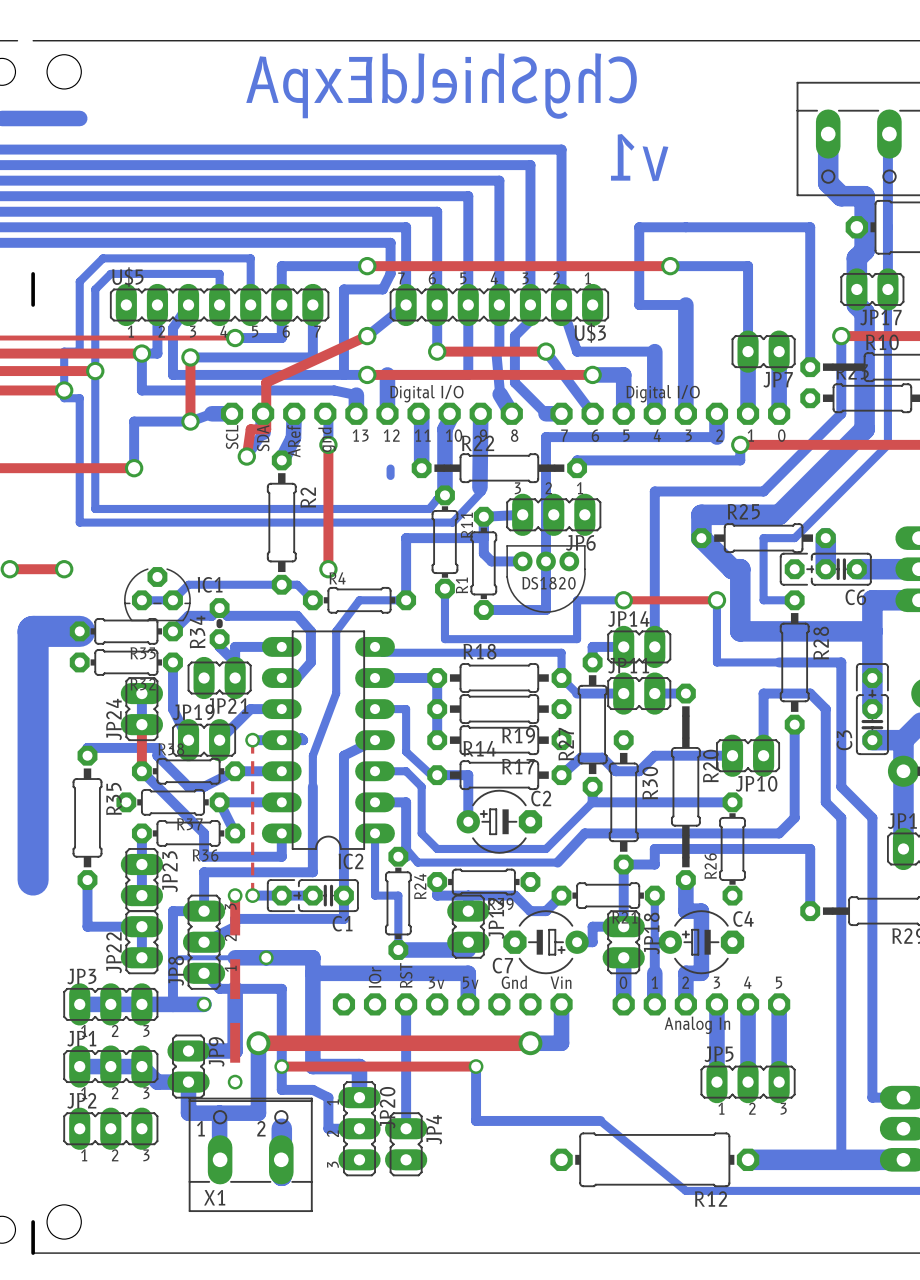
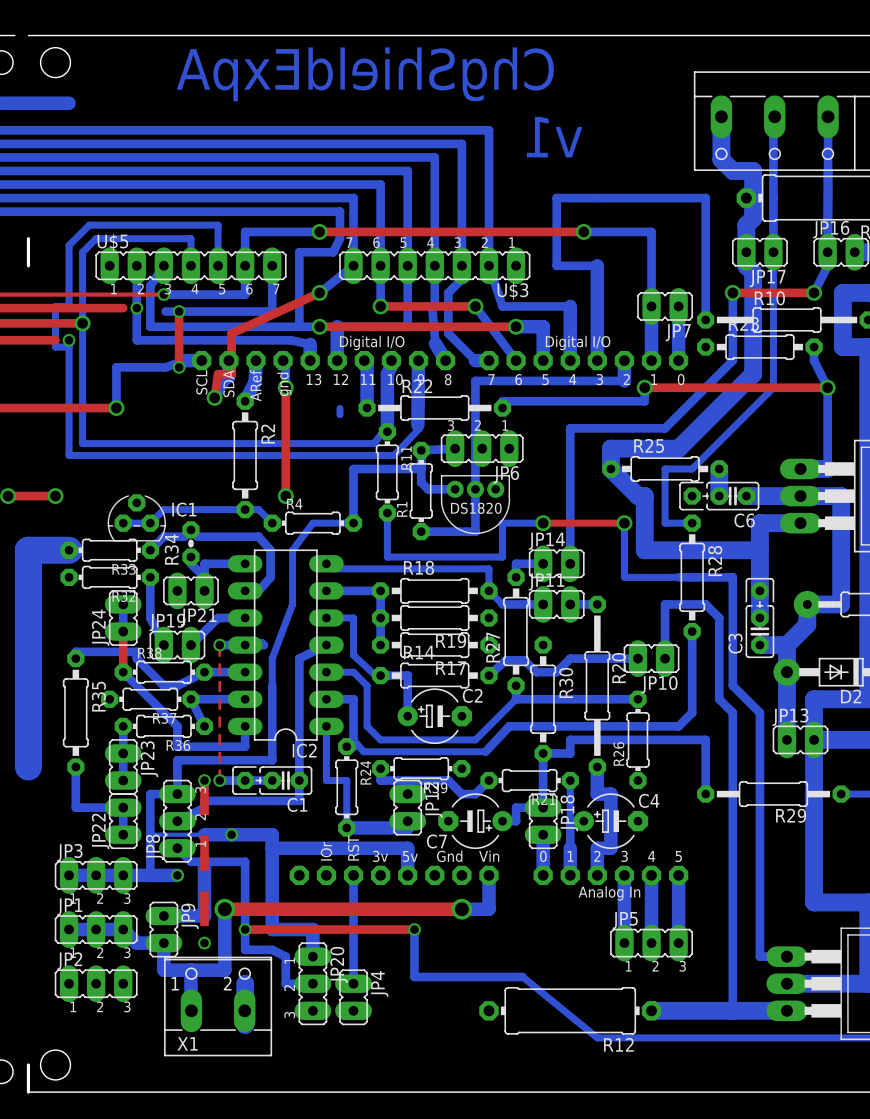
bottom track: none -> (163, 294) (204, 294)
top track: (188, 338) (235, 338) -> none
via: none -> (163, 294)
via: (235, 338) -> none
via: (141, 353) -> none
bottom track: (157, 353) (141, 353) (141, 390) (157, 390) -> (136, 308) (136, 340)
via: none -> (136, 308)
top track: (190, 357) (190, 421) -> (179, 311) (179, 367)
via: (190, 357) -> none
via: none -> (179, 311)
via: (64, 390) -> none
via: none -> (69, 340)
via: (190, 421) -> none
via: none -> (179, 367)

